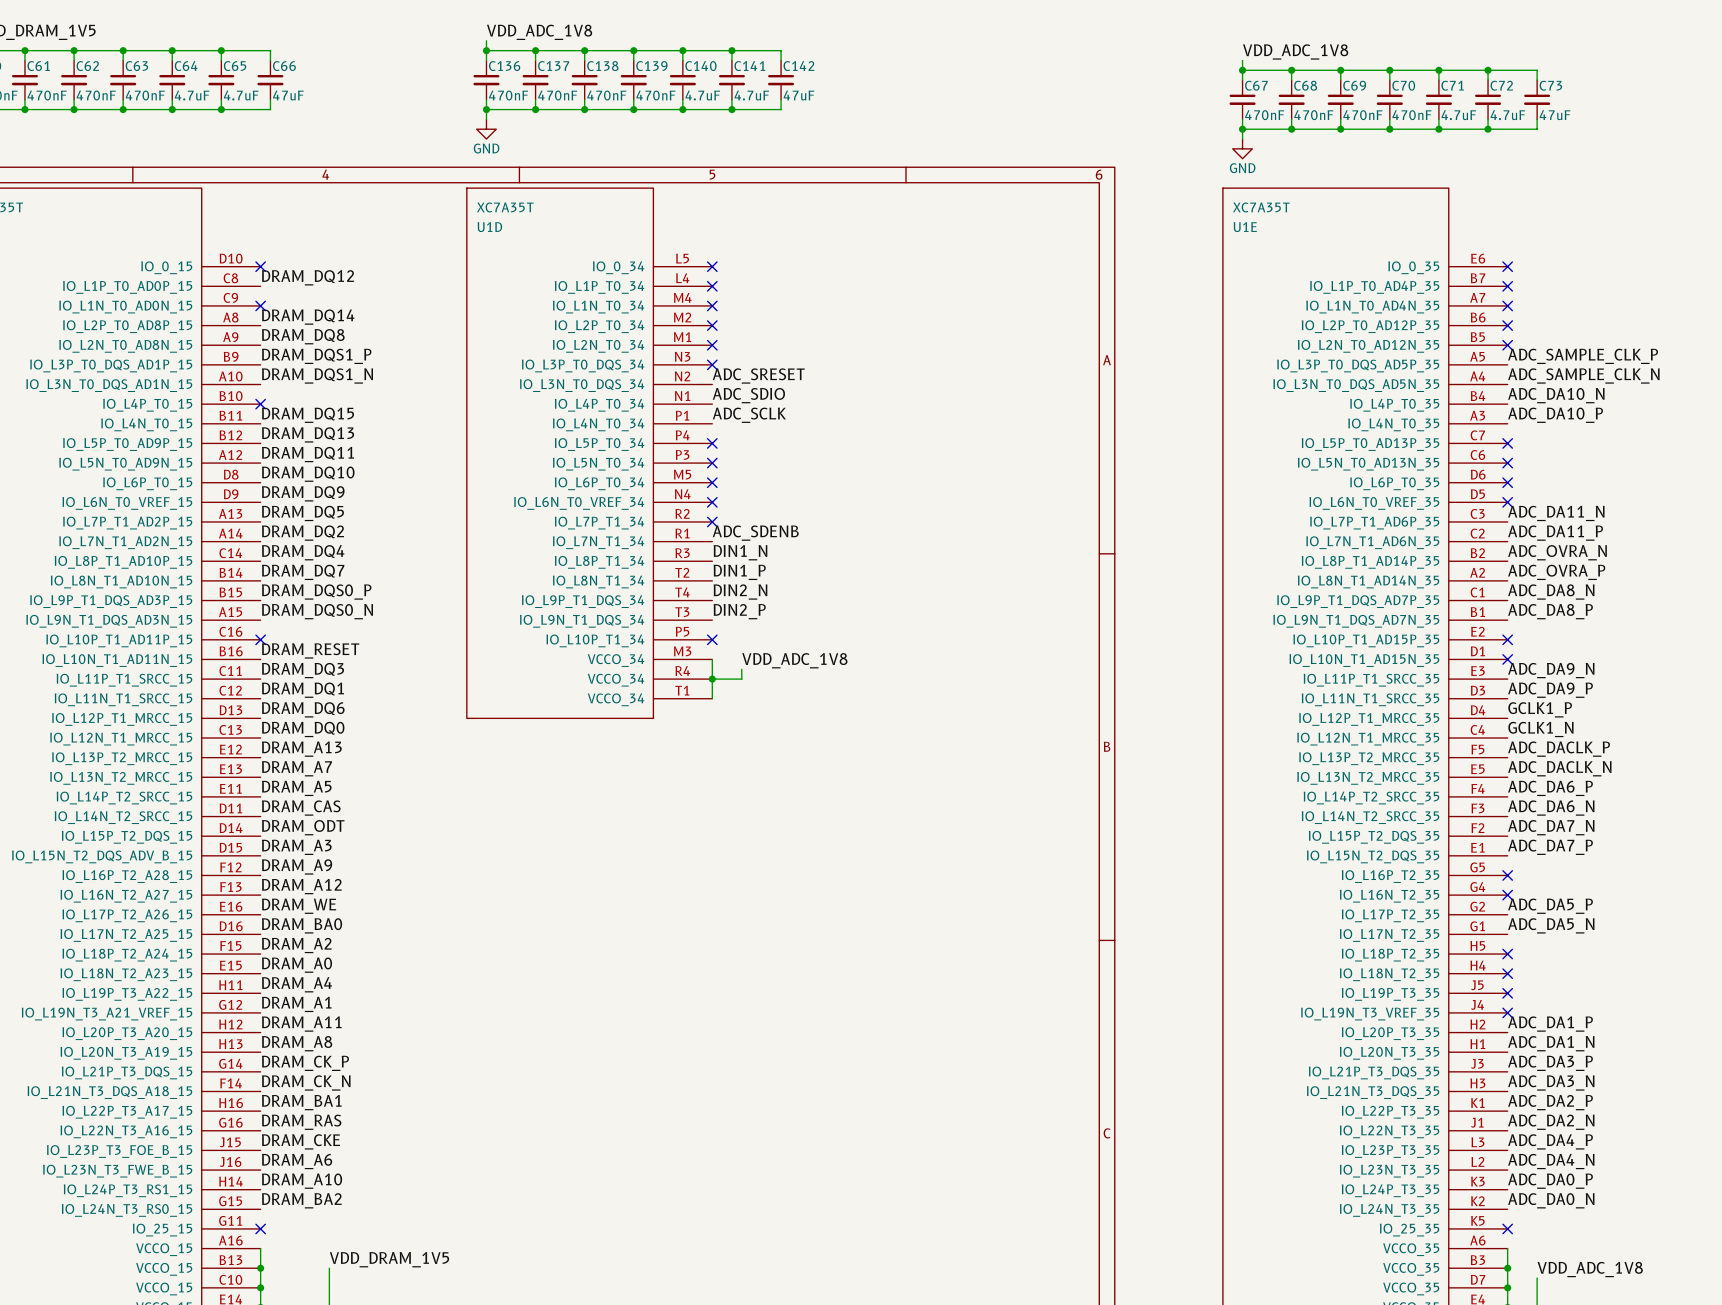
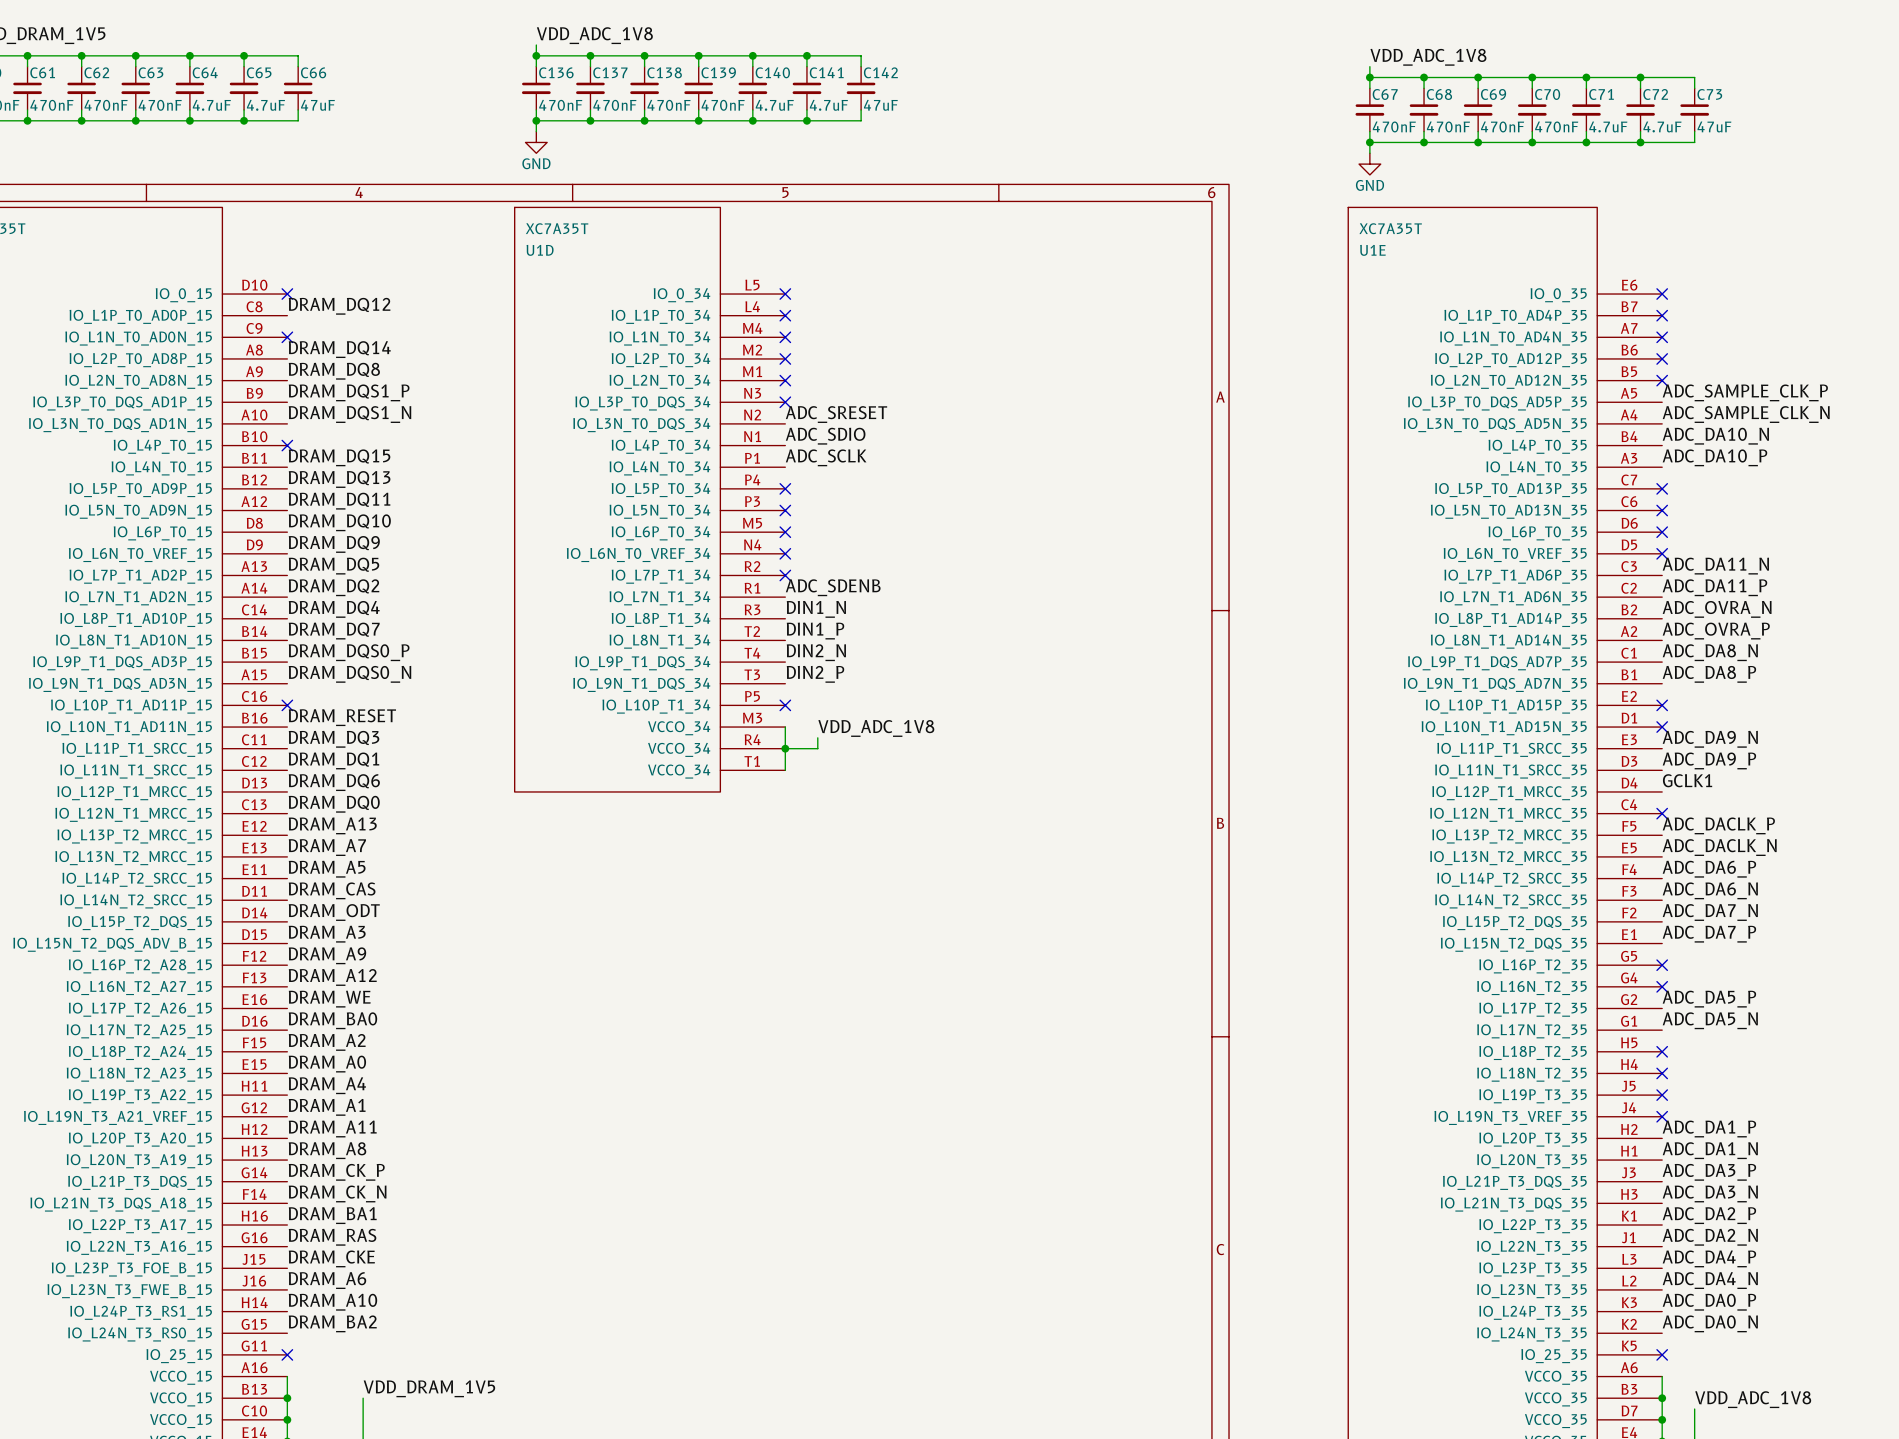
label: GCLK1_P (1540, 709) -> GCLK1 (1687, 780)
label: GCLK1_N (1540, 729) -> none
no-connect mark: none -> (1662, 813)

